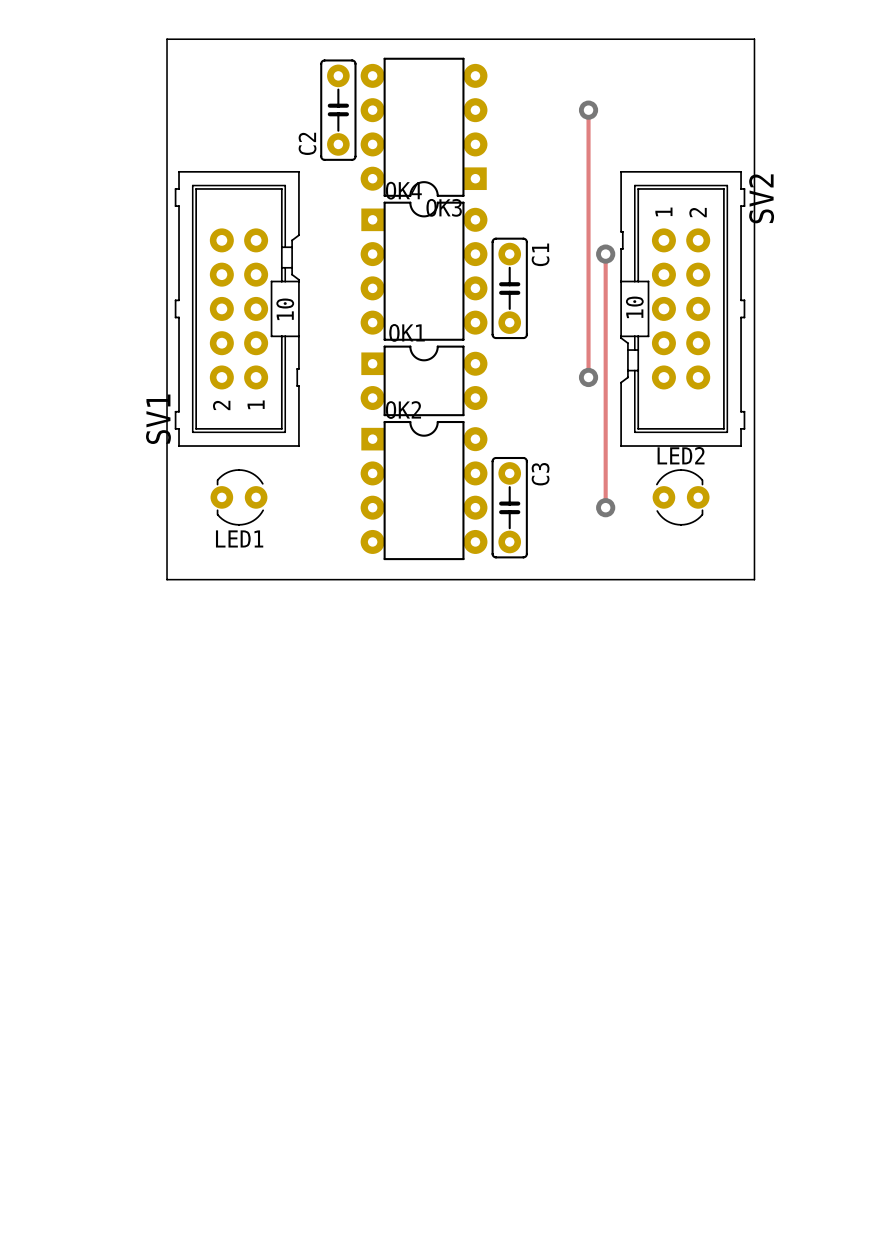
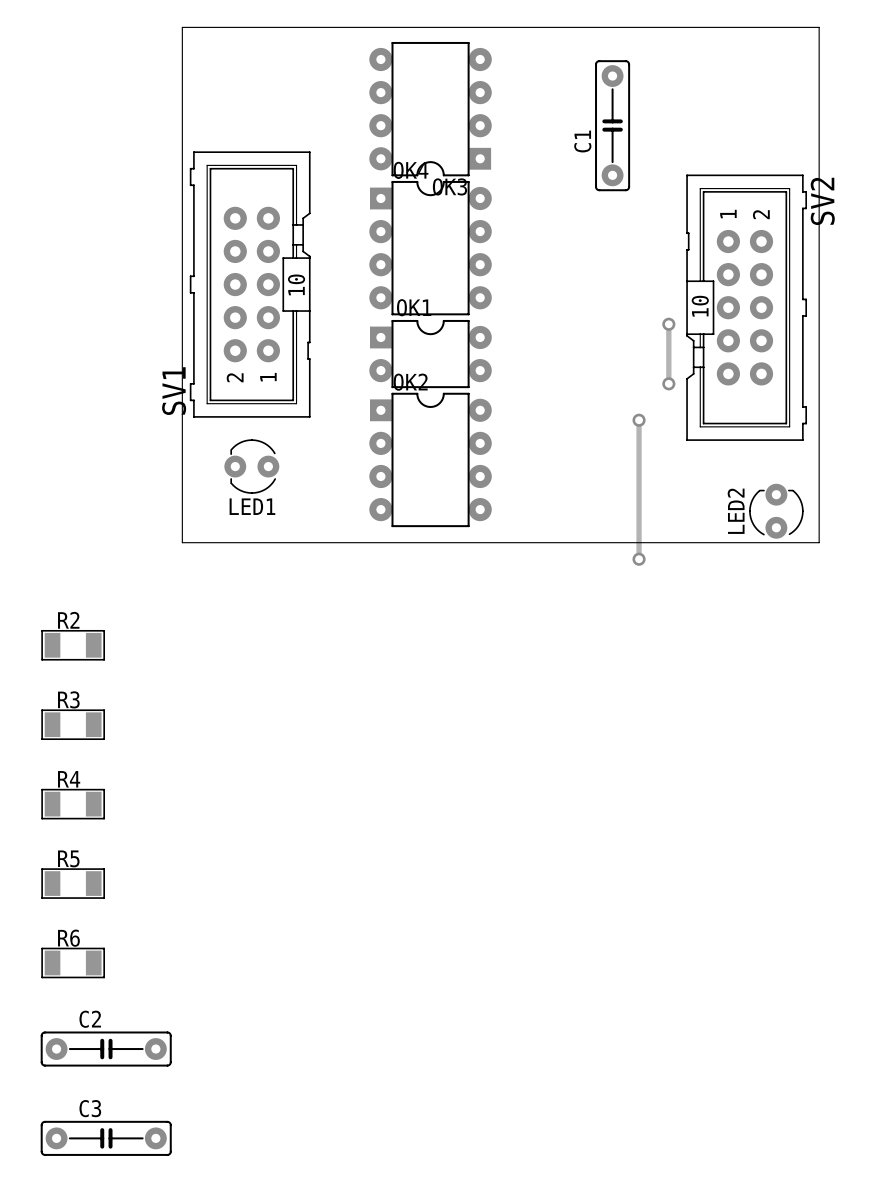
board edge: (167, 42) (167, 39) (754, 39) (754, 579) (167, 579) (167, 576) -> (182, 27) (819, 27) (819, 542) (182, 542)
C2 footprint: [320, 59, 357, 161] -> [40, 1031, 172, 1067]
track: (588, 110) (588, 377) -> none
via: (588, 110) -> none
C2 name position: C2 (307, 143) -> C2 (90, 1019)
C1 footprint: [491, 237, 528, 340] -> [595, 60, 631, 192]
C1 name position: C1 (540, 254) -> C1 (582, 141)
track: (605, 254) (605, 507) -> none
via: (605, 254) -> none
SV2 position: (682, 308) -> (746, 307)
track: none -> (668, 324) (668, 383)
via: none -> (668, 324)
via: (588, 377) -> none
via: none -> (668, 383)
track: none -> (639, 420) (639, 559)
via: none -> (639, 420)
C3 footprint: [491, 456, 528, 559] -> [40, 1120, 172, 1156]
C3 name position: C3 (540, 474) -> C3 (90, 1108)
LED2 rotation: 0° (681, 497) -> 90° counterclockwise (776, 511)
LED2 position: (681, 497) -> (776, 511)
via: (605, 507) -> none
via: none -> (639, 559)
R2: none -> (73, 645)
R3: none -> (73, 724)
R4: none -> (73, 804)
R5: none -> (73, 883)
R6: none -> (73, 962)

